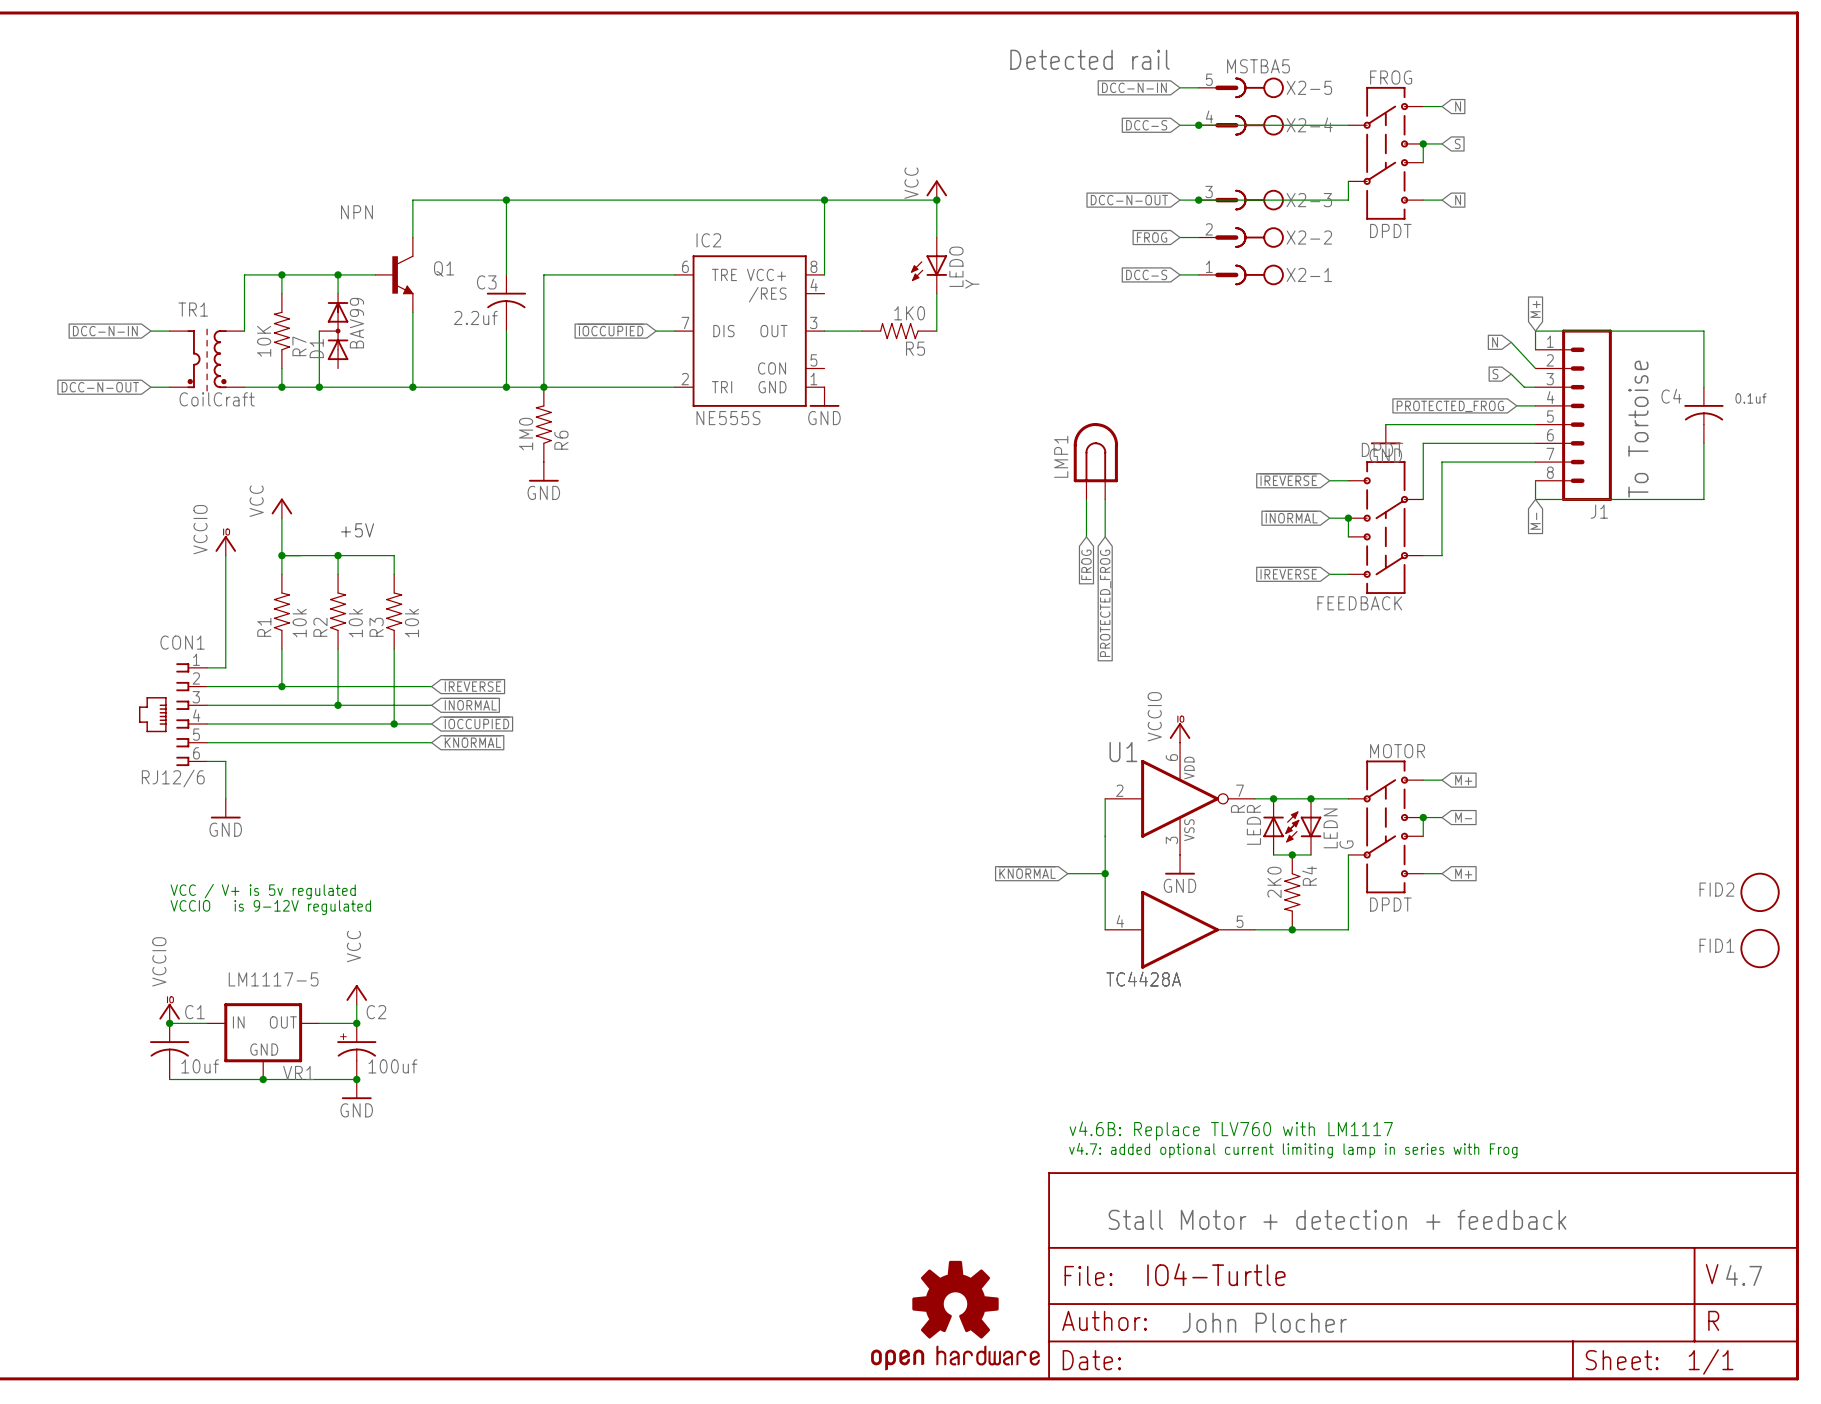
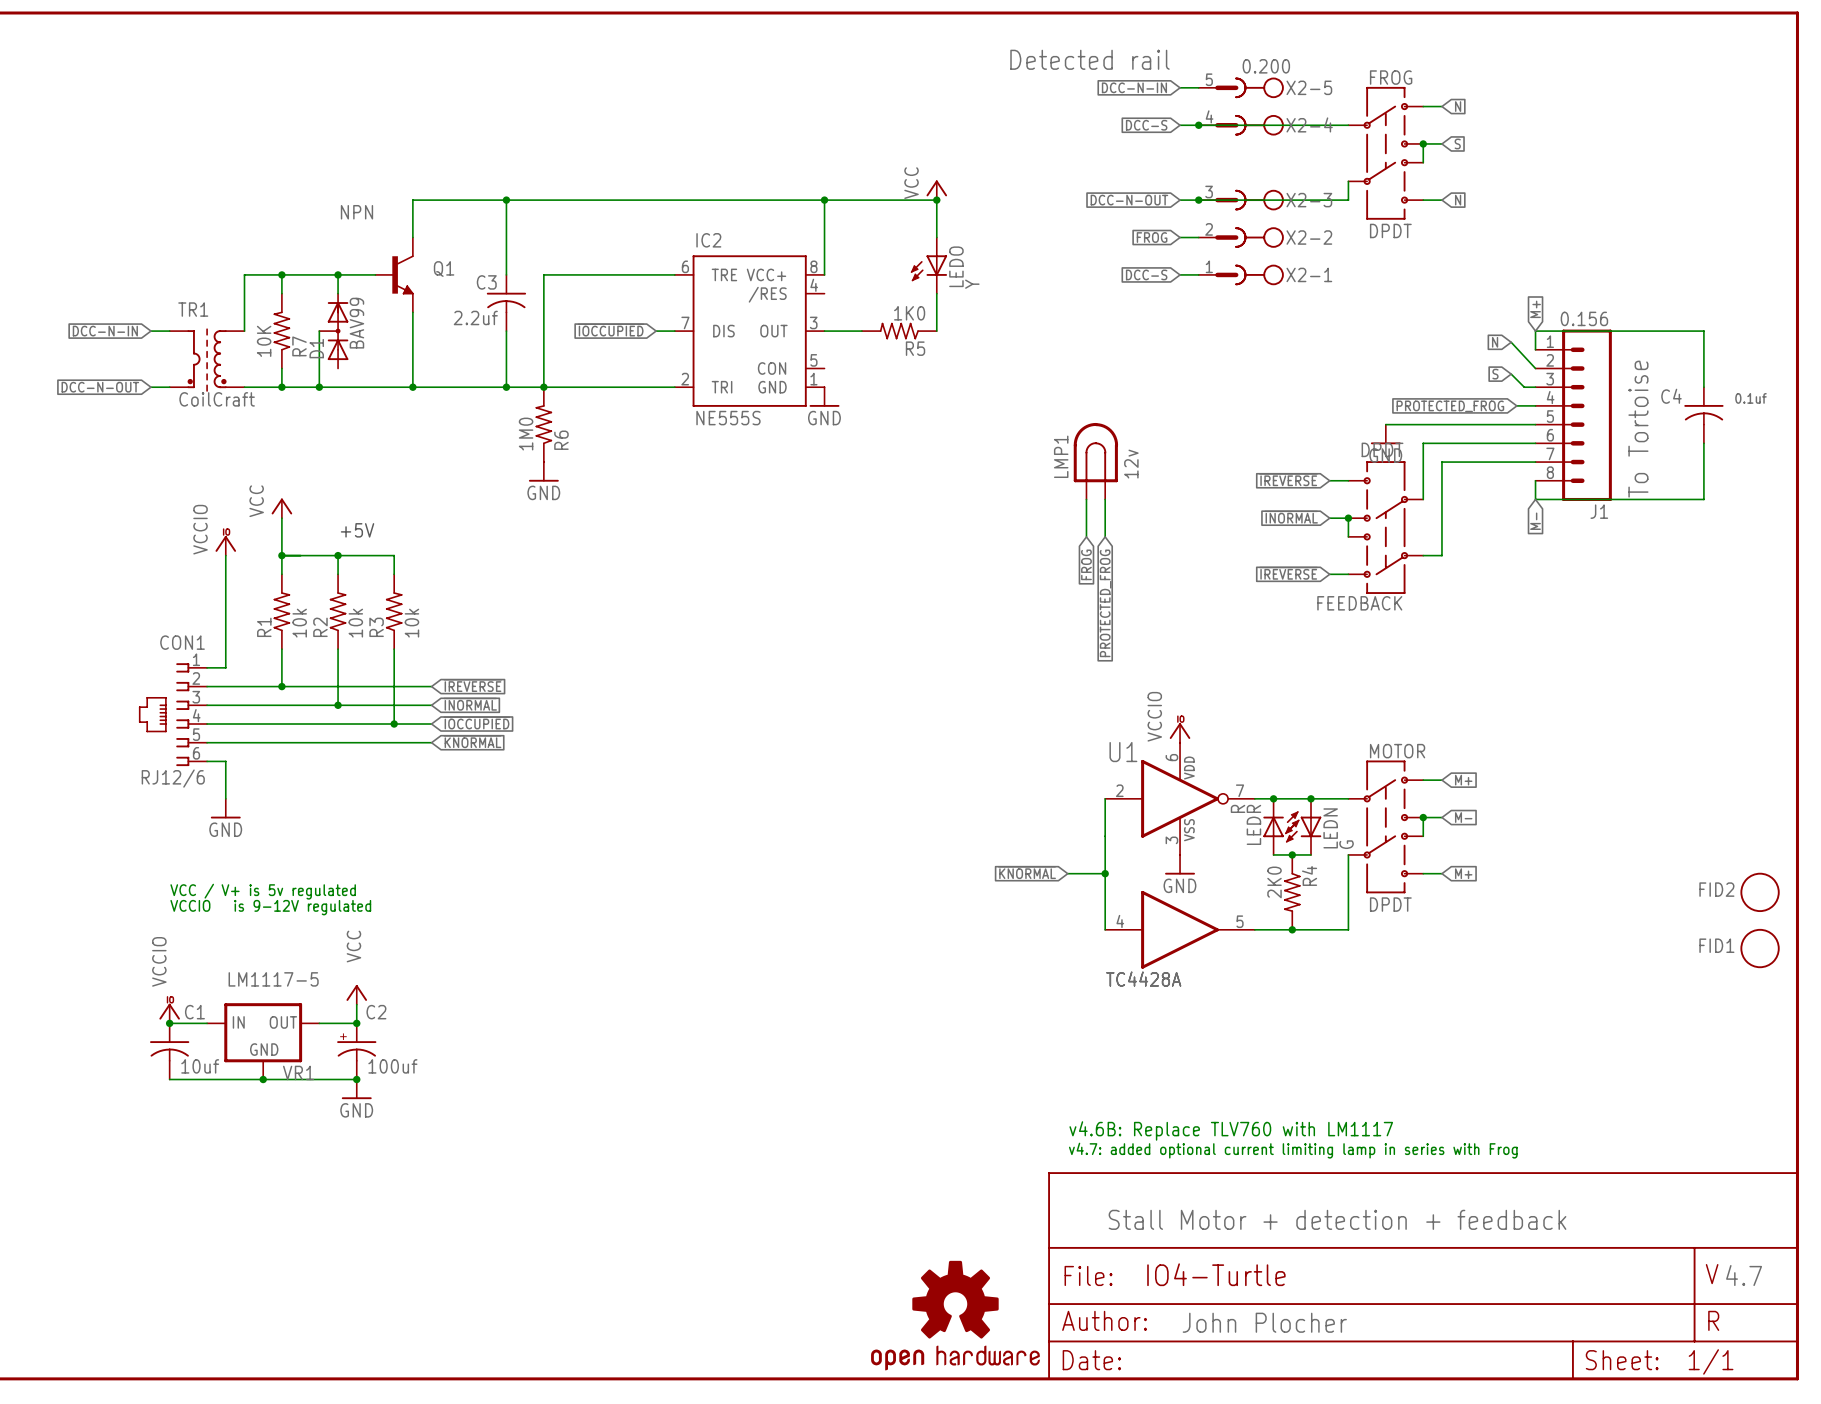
X2-5 value: MSTBA5 (1258, 66) -> 0.200 (1266, 66)
J1 value: none -> 0.156 (1584, 318)
LMP1 value: none -> 12v (1131, 464)

